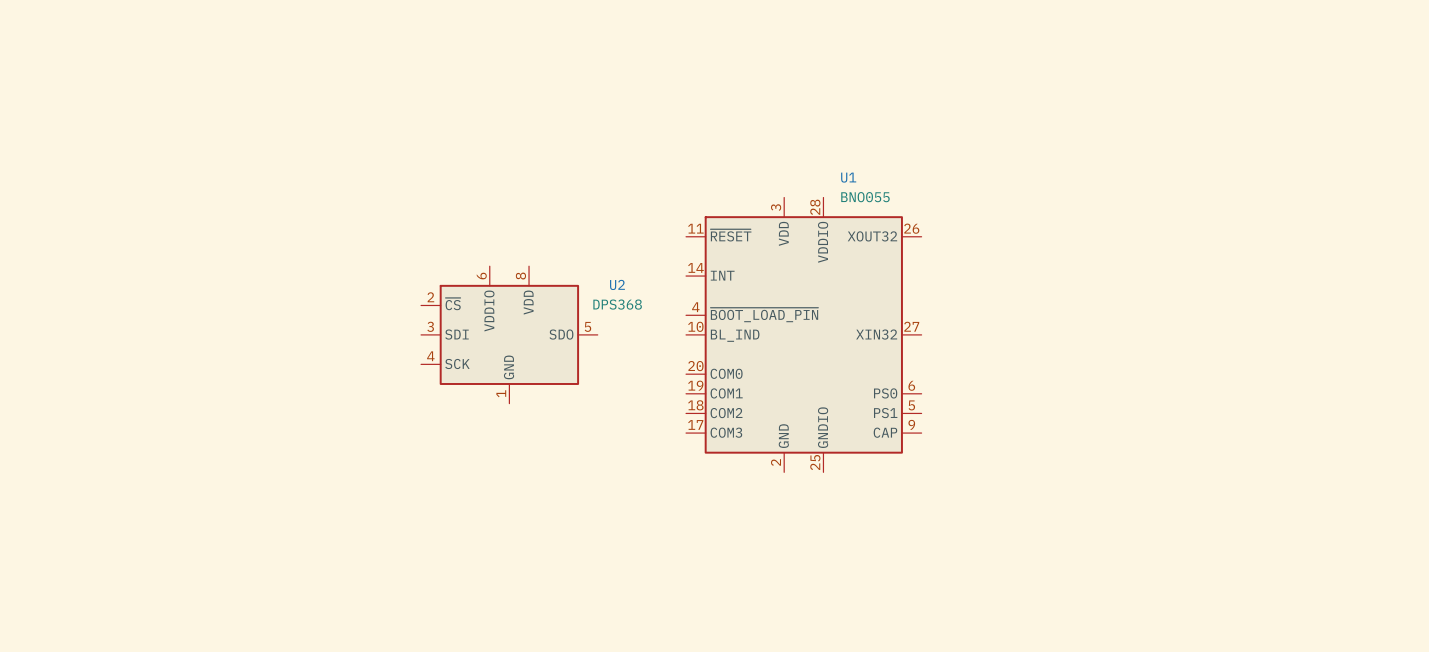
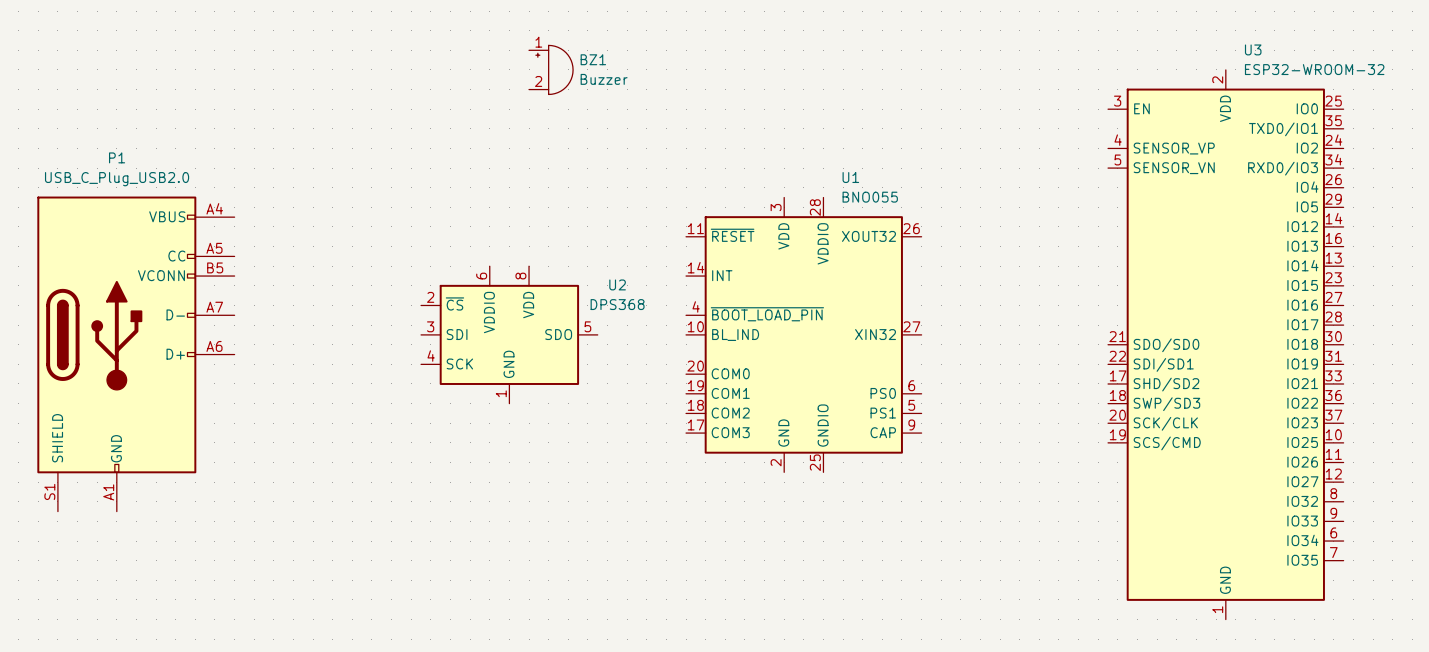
BZ1: none -> Buzzer (551, 69)
U3: none -> ESP32-WROOM-32 (1225, 344)
P1: none -> USB_C_Plug_USB2.0 (135, 354)

